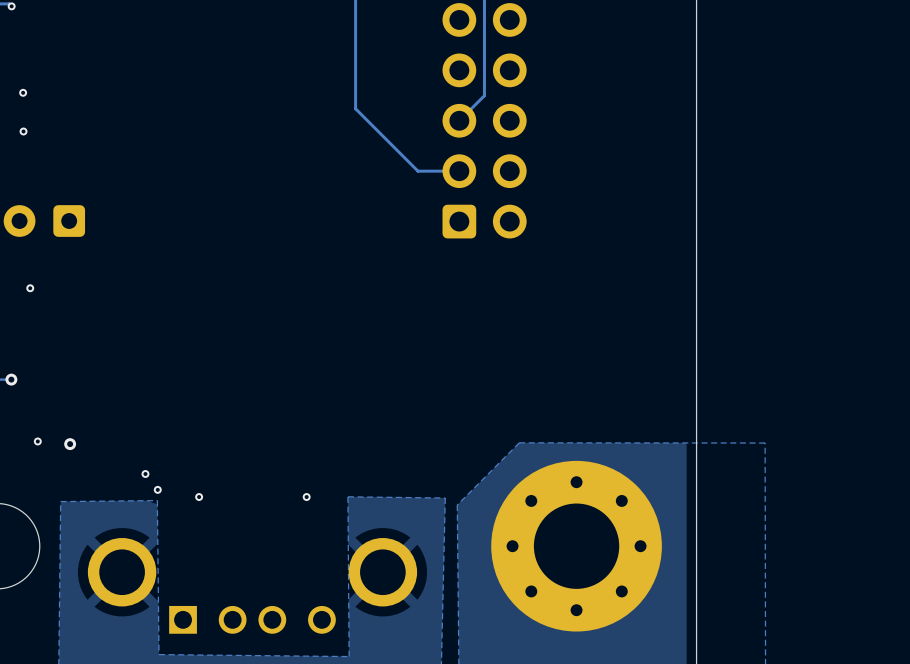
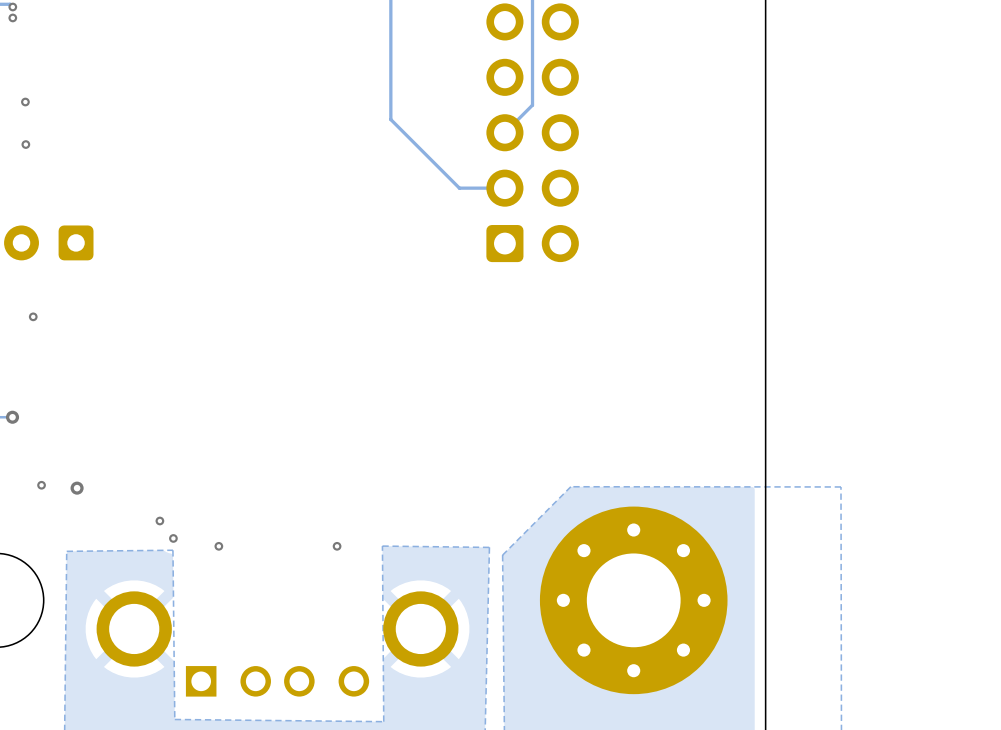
via: none -> (12, 17)

